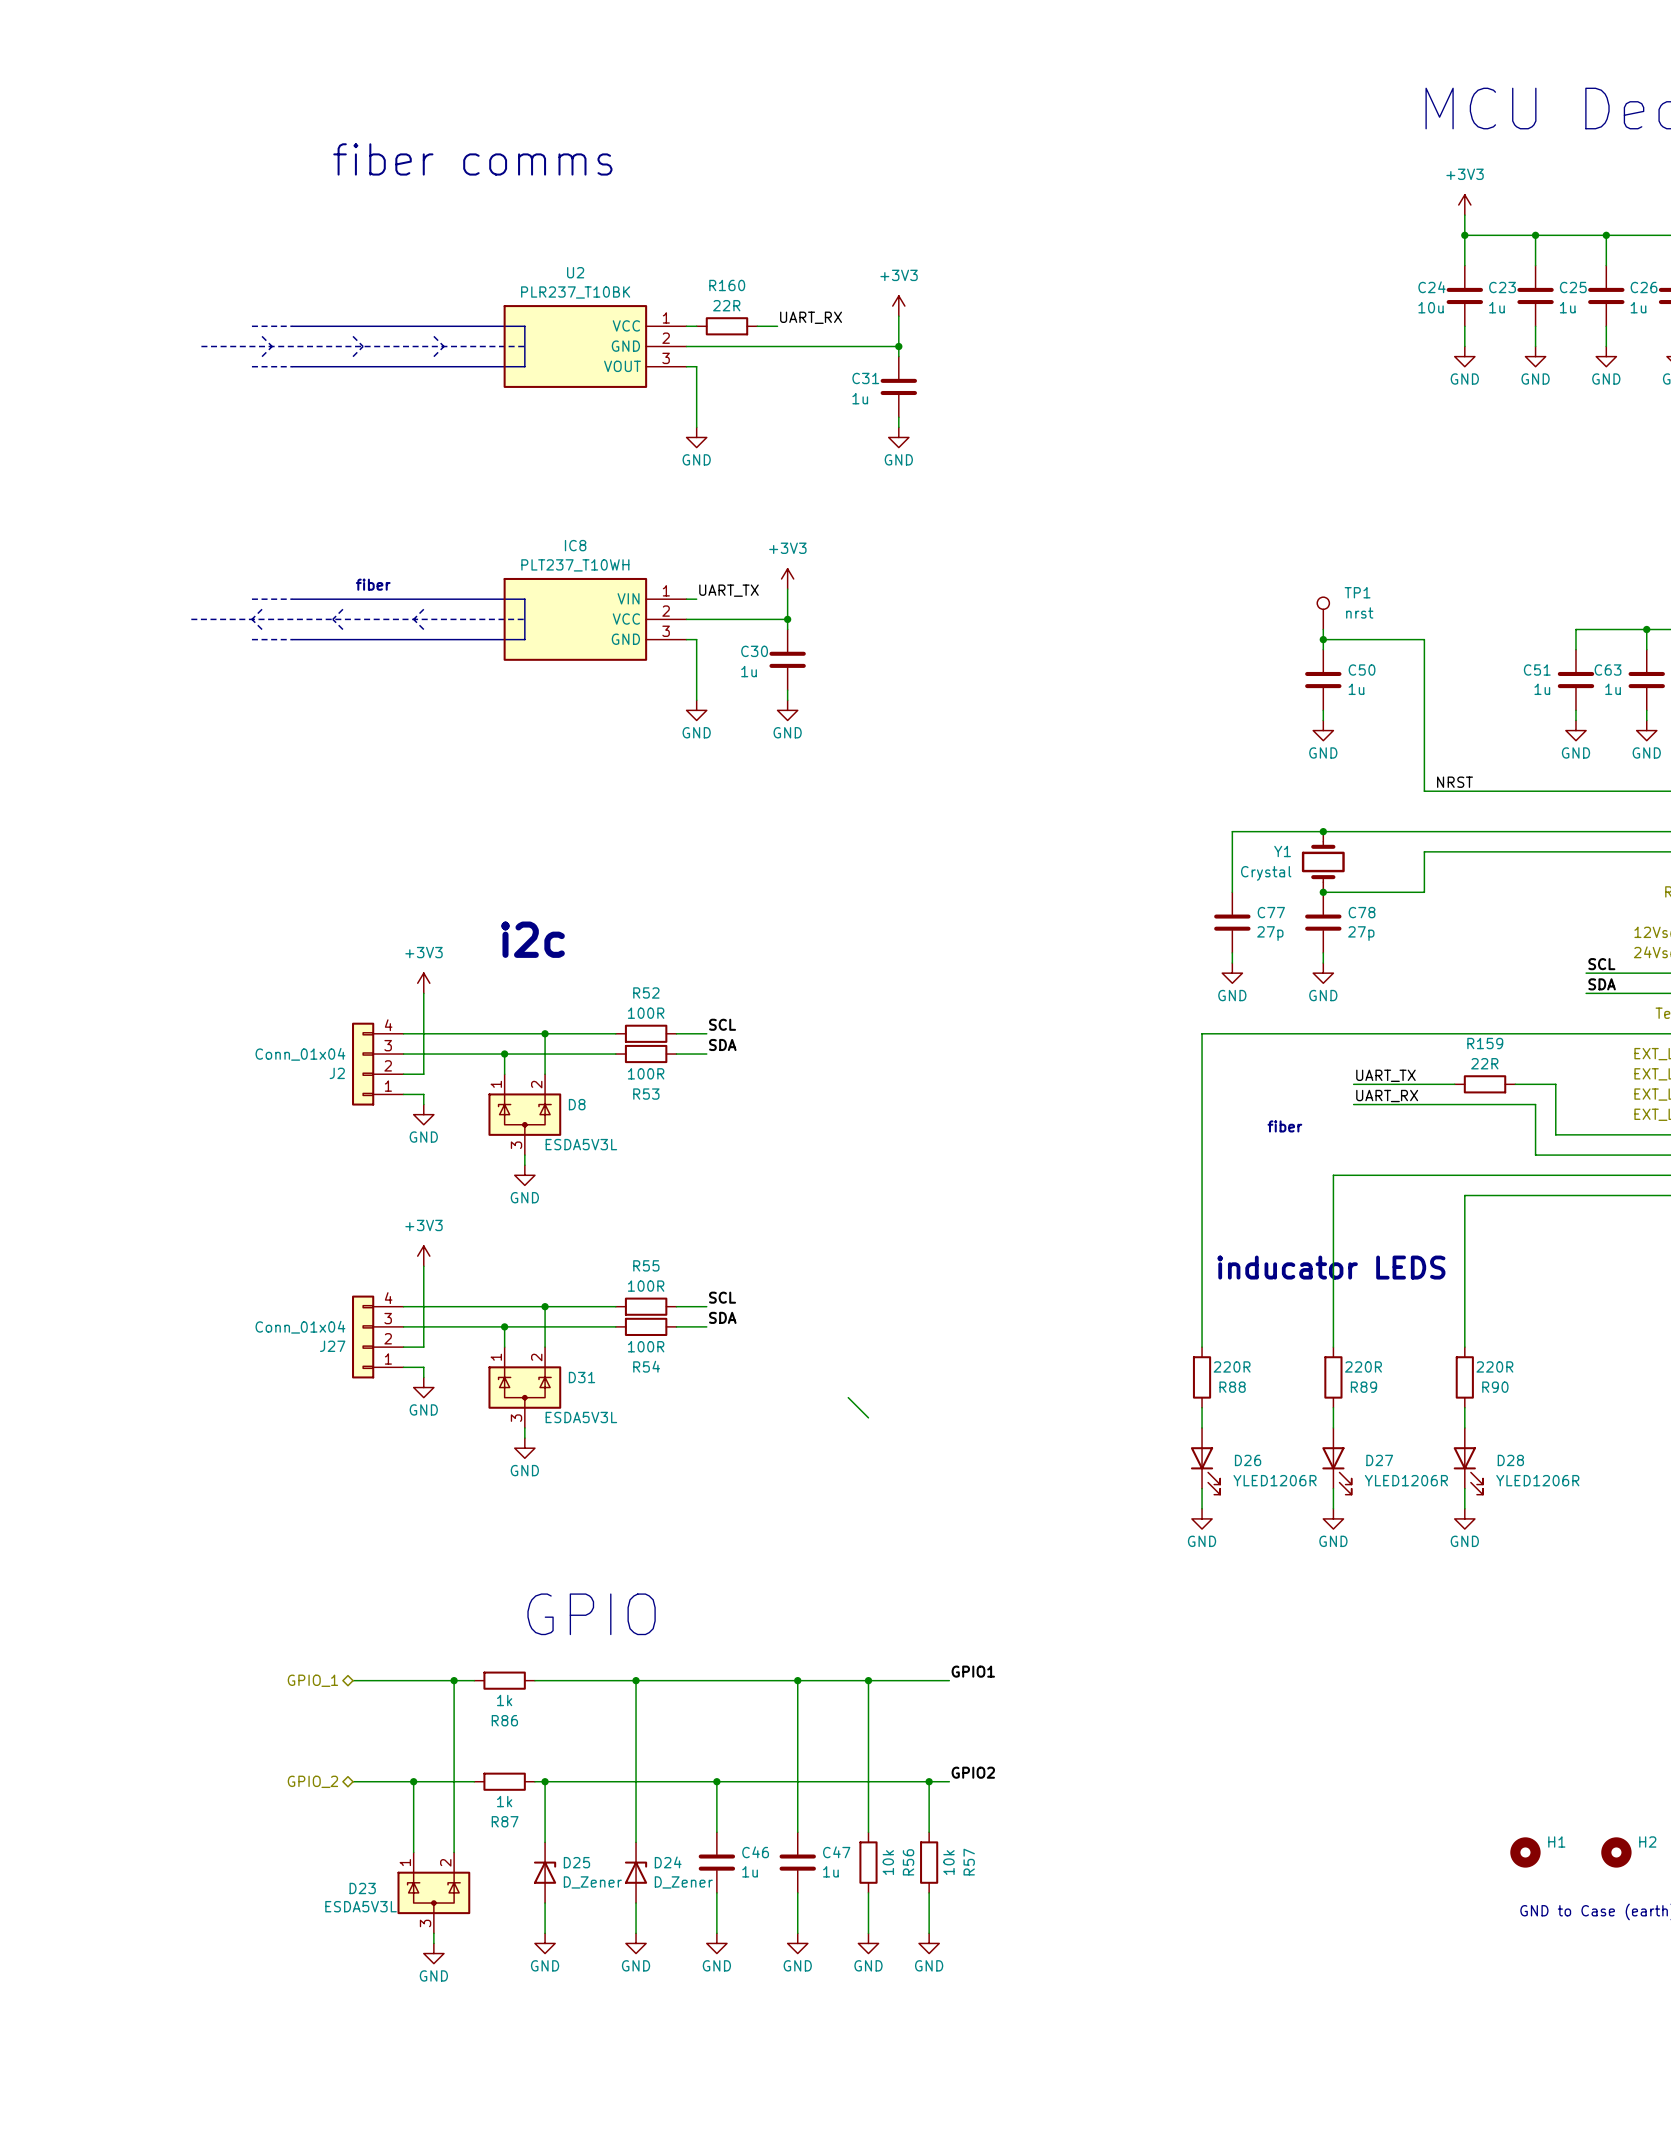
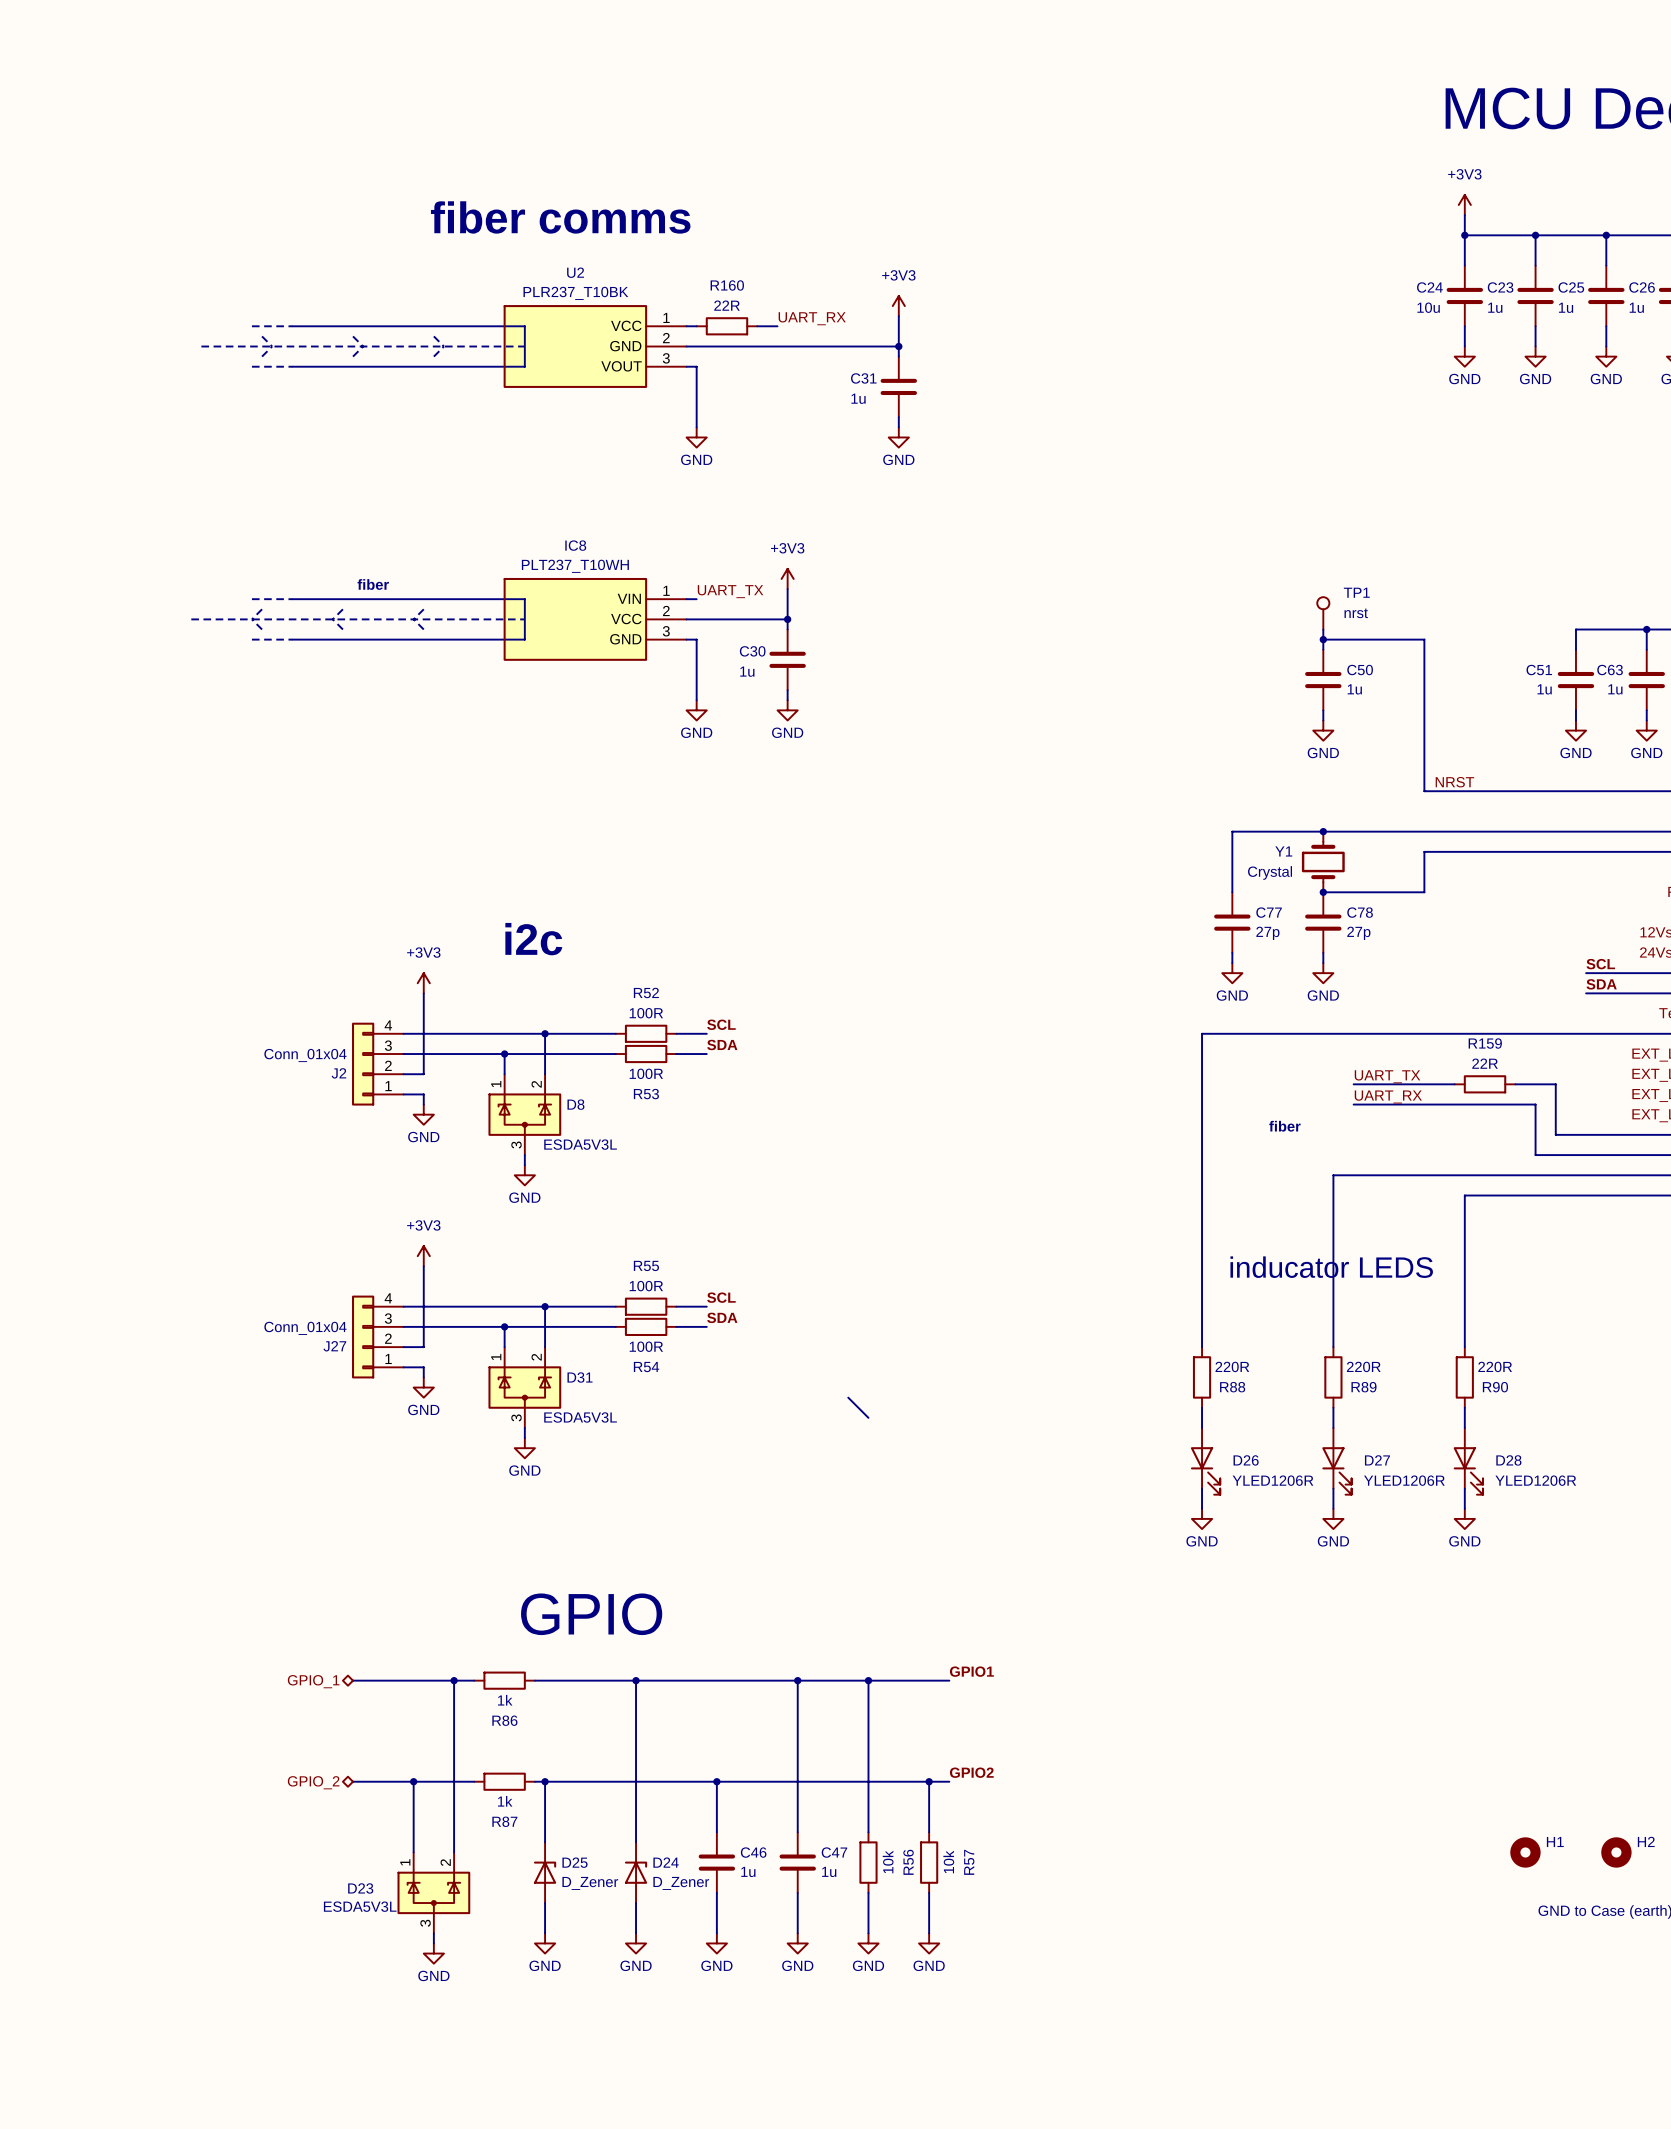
text position: fiber comms (472, 159) -> fiber comms (560, 217)

